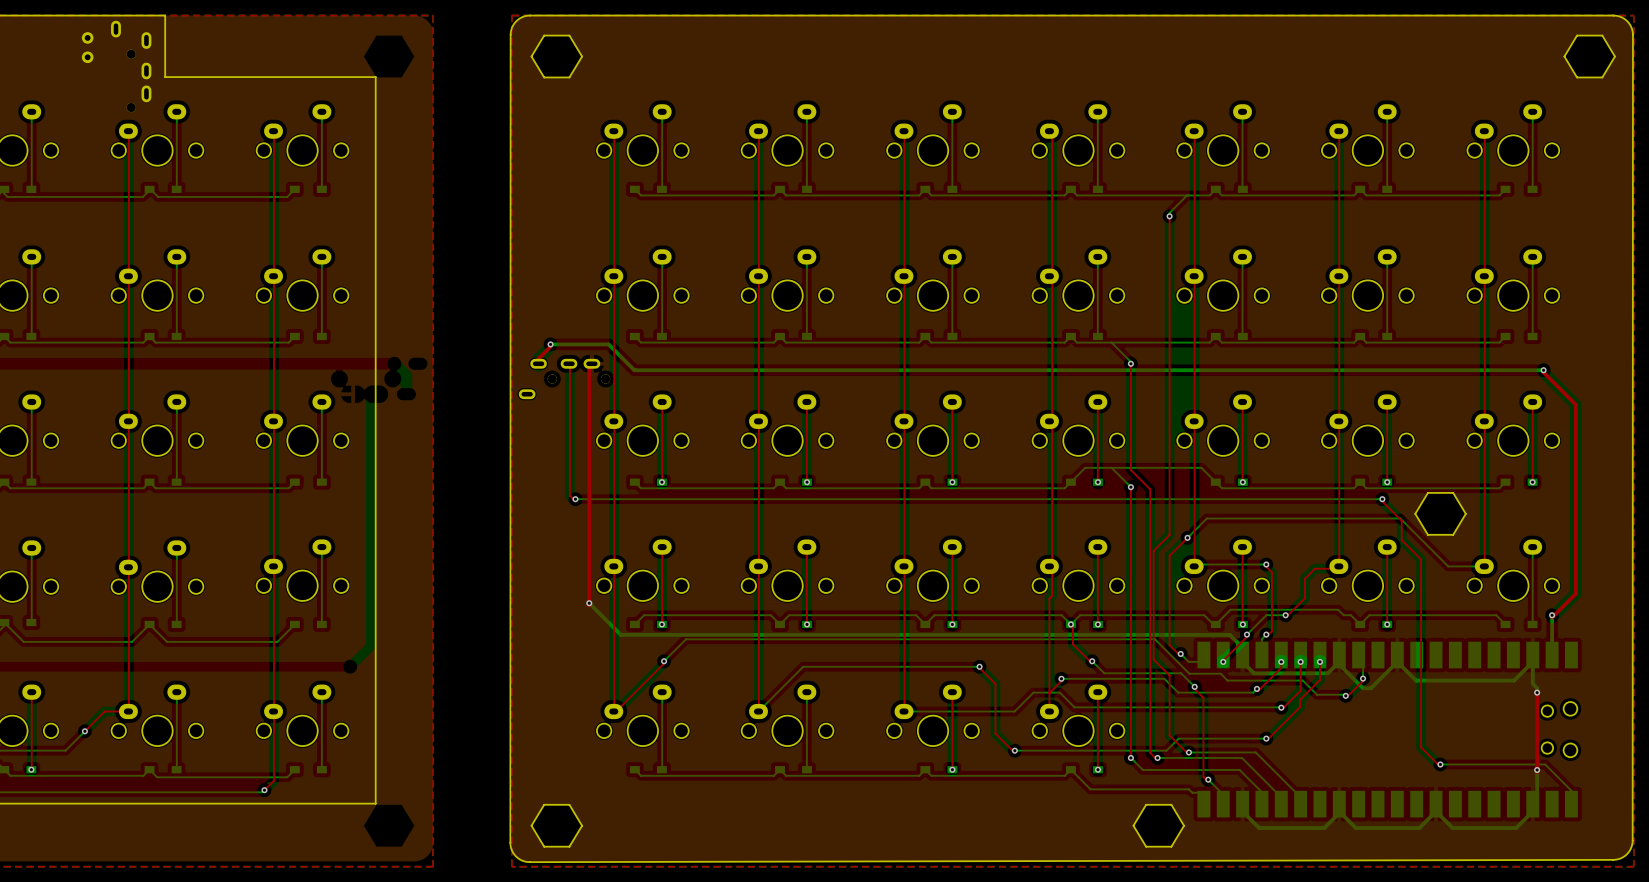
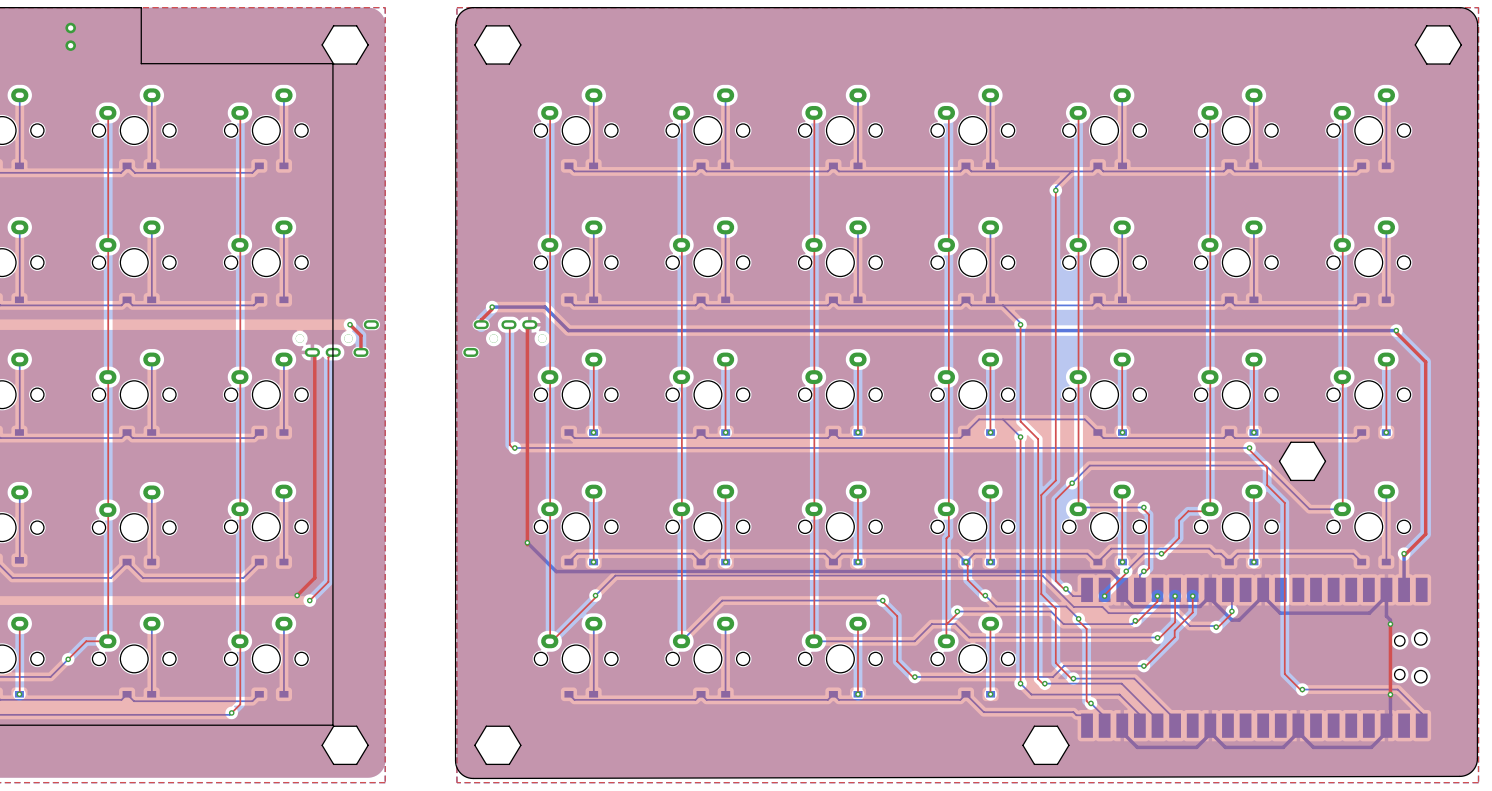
drawing: none -> [321, 25, 369, 65]
part: (131, 66) -> none
top track: none -> (350, 324) (360, 335) (360, 352)
via: none -> (350, 324)
part: none -> (337, 338)
top track: none -> (312, 352) (314, 354) (314, 577) (297, 595)
top track: none -> (333, 352) (328, 357) (328, 581) (309, 600)
via: none -> (297, 595)
via: none -> (309, 600)
drawing: none -> [321, 726, 369, 765]

